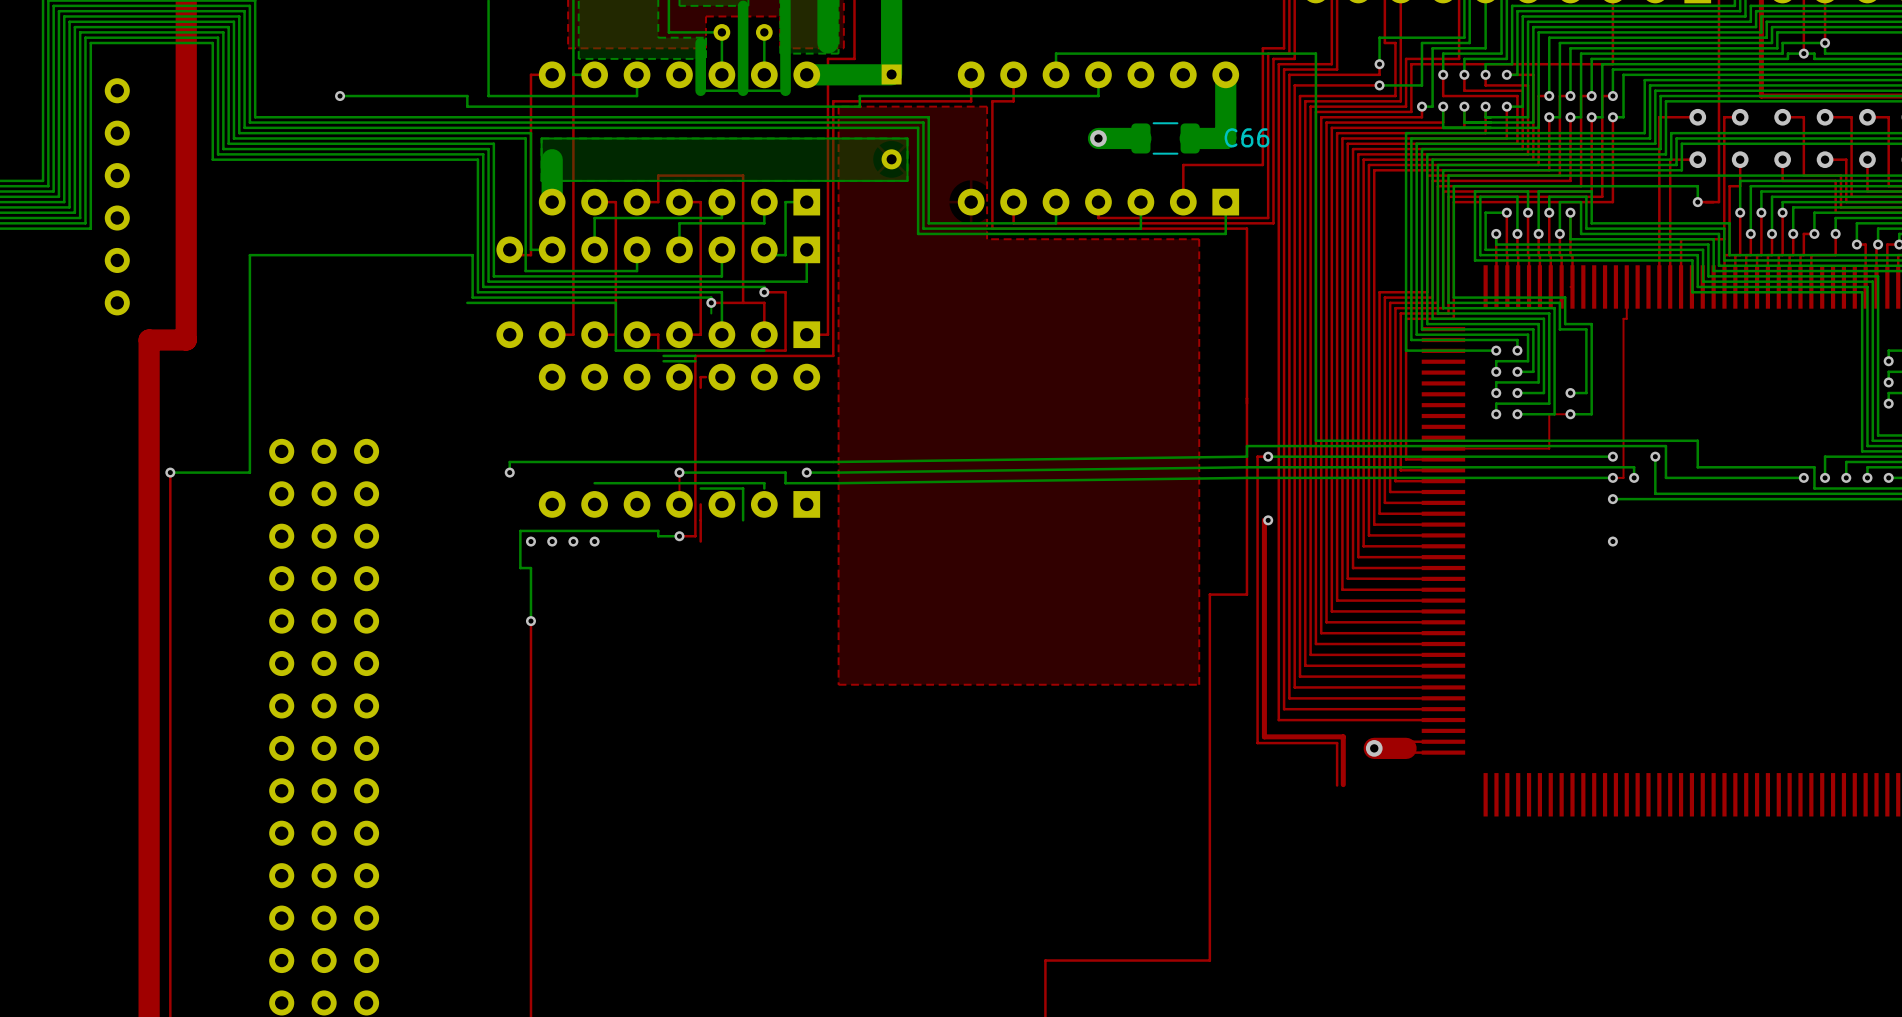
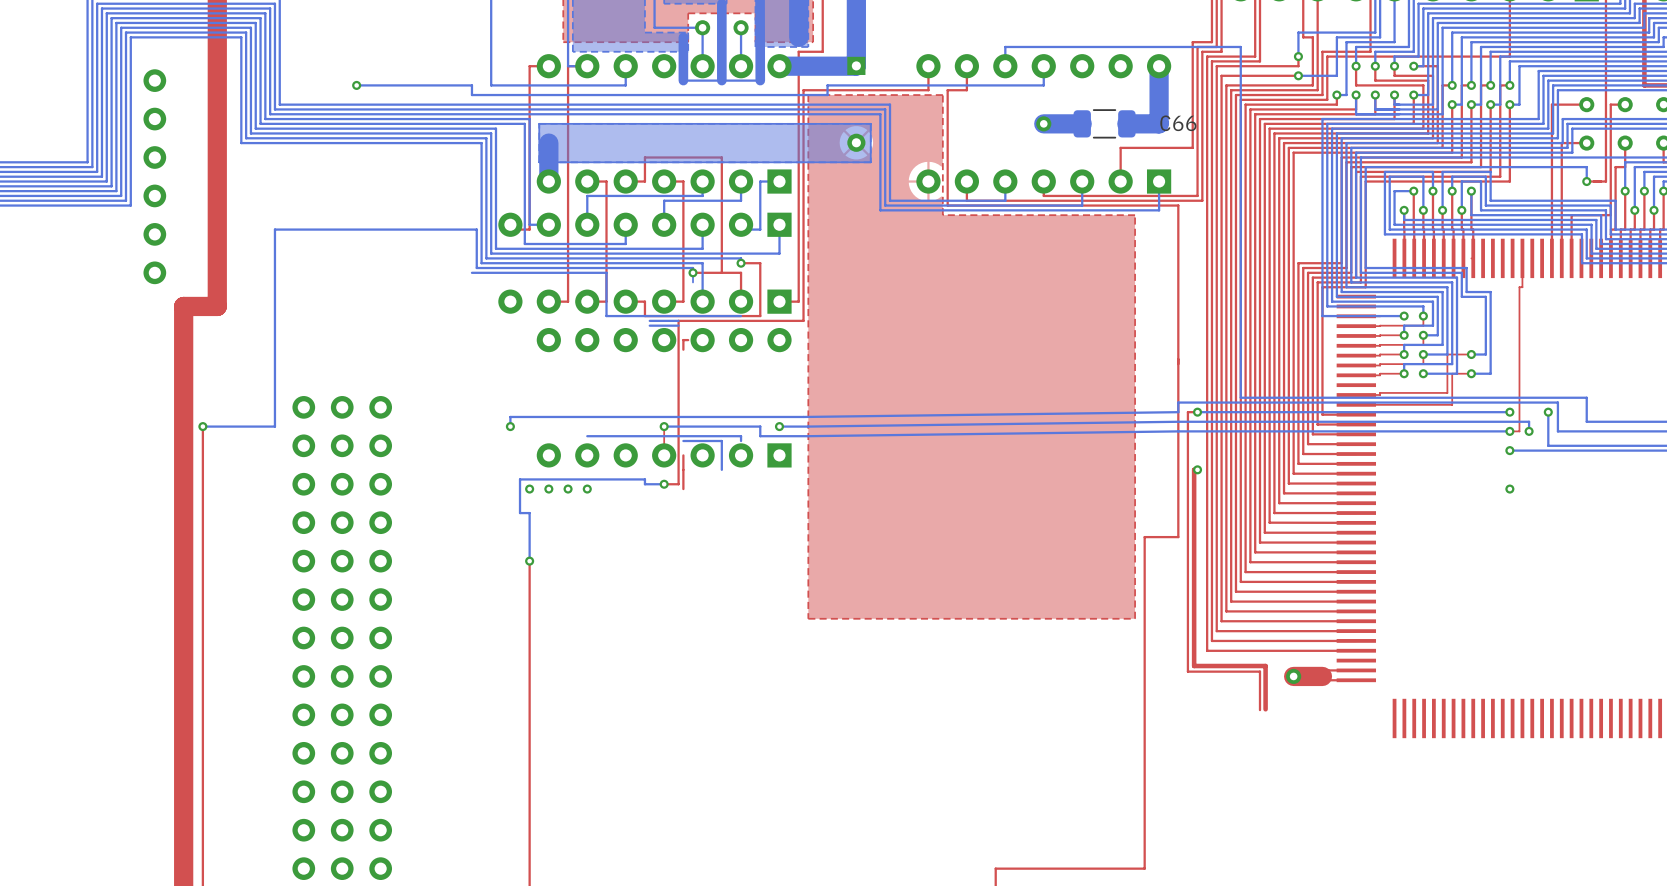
top track: none -> (1423, 316) (1423, 325) (1356, 326)
top track: none -> (1404, 335) (1356, 335)
top track: none -> (1423, 335) (1423, 344) (1356, 345)
top track: none -> (1404, 354) (1356, 355)
top track: none -> (1423, 354) (1423, 364) (1356, 365)
top track: none -> (1471, 354) (1447, 354) (1447, 392) (1380, 392) (1380, 394) (1356, 394)
top track: none -> (1404, 373) (1356, 375)

